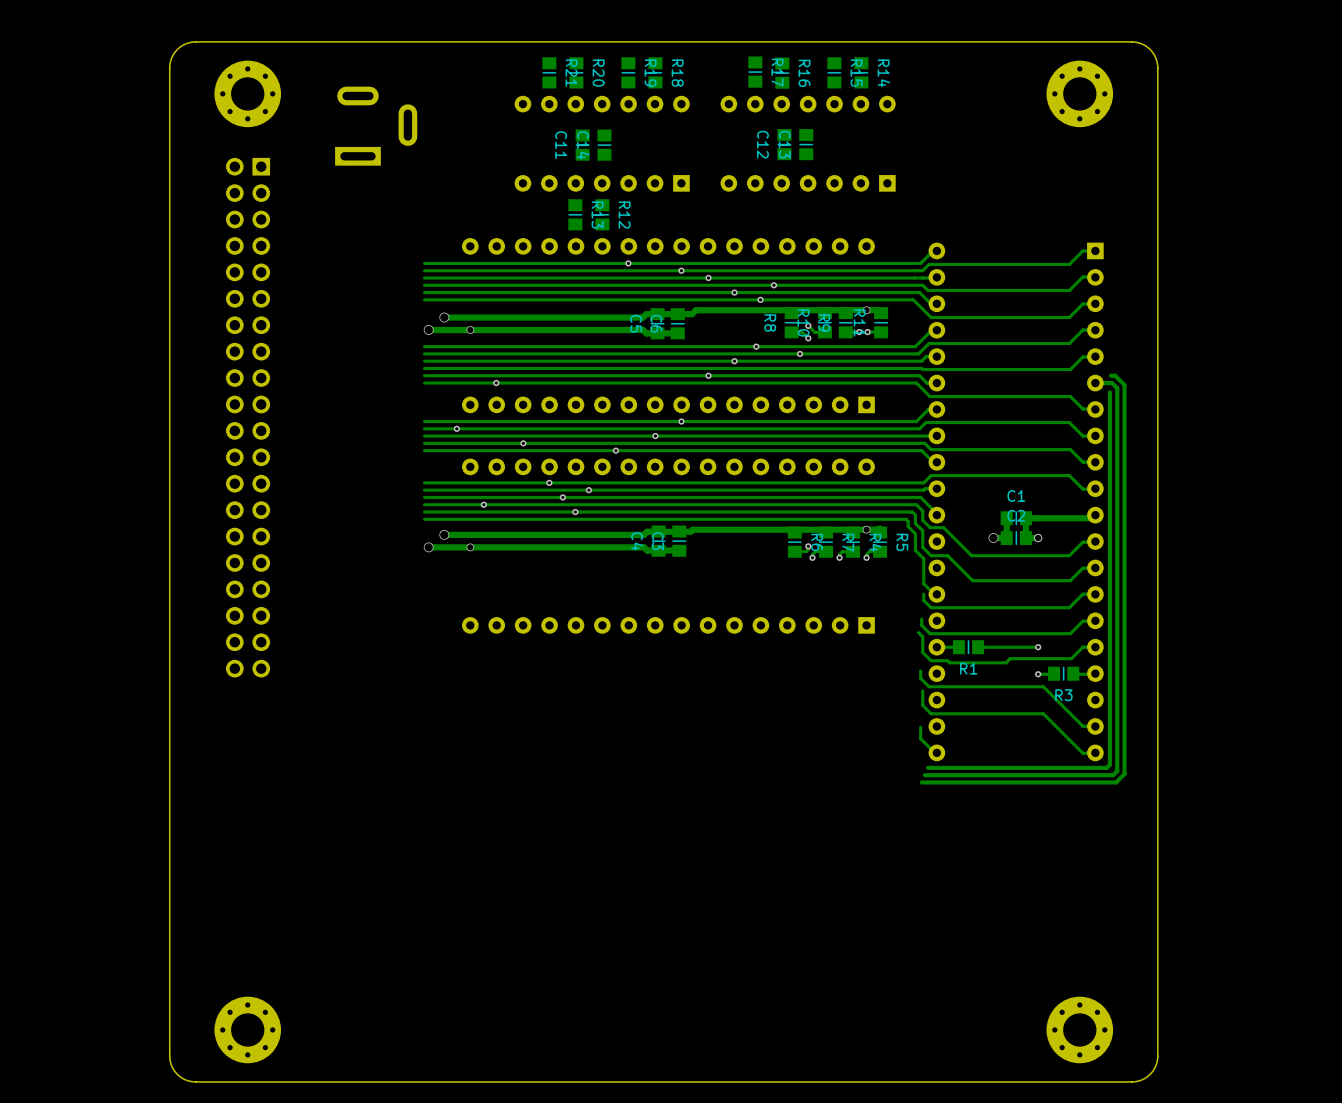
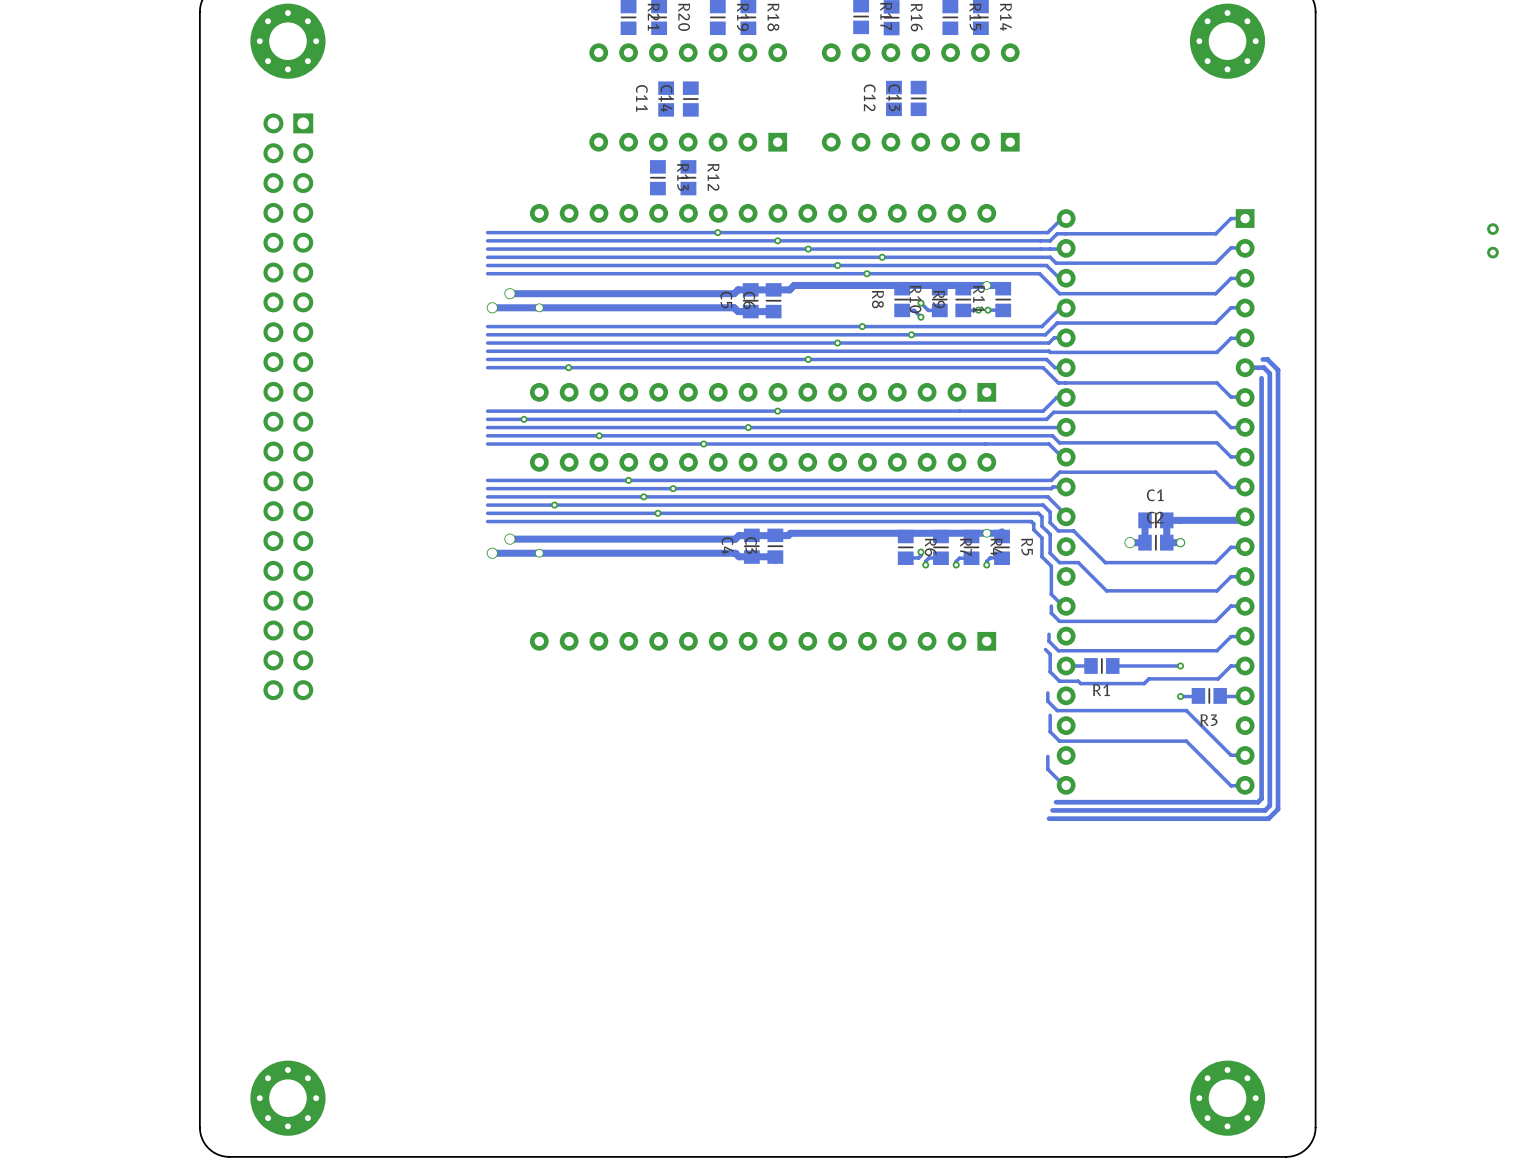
part: (376, 126) -> none
part: none -> (1492, 229)
part: none -> (1492, 252)

